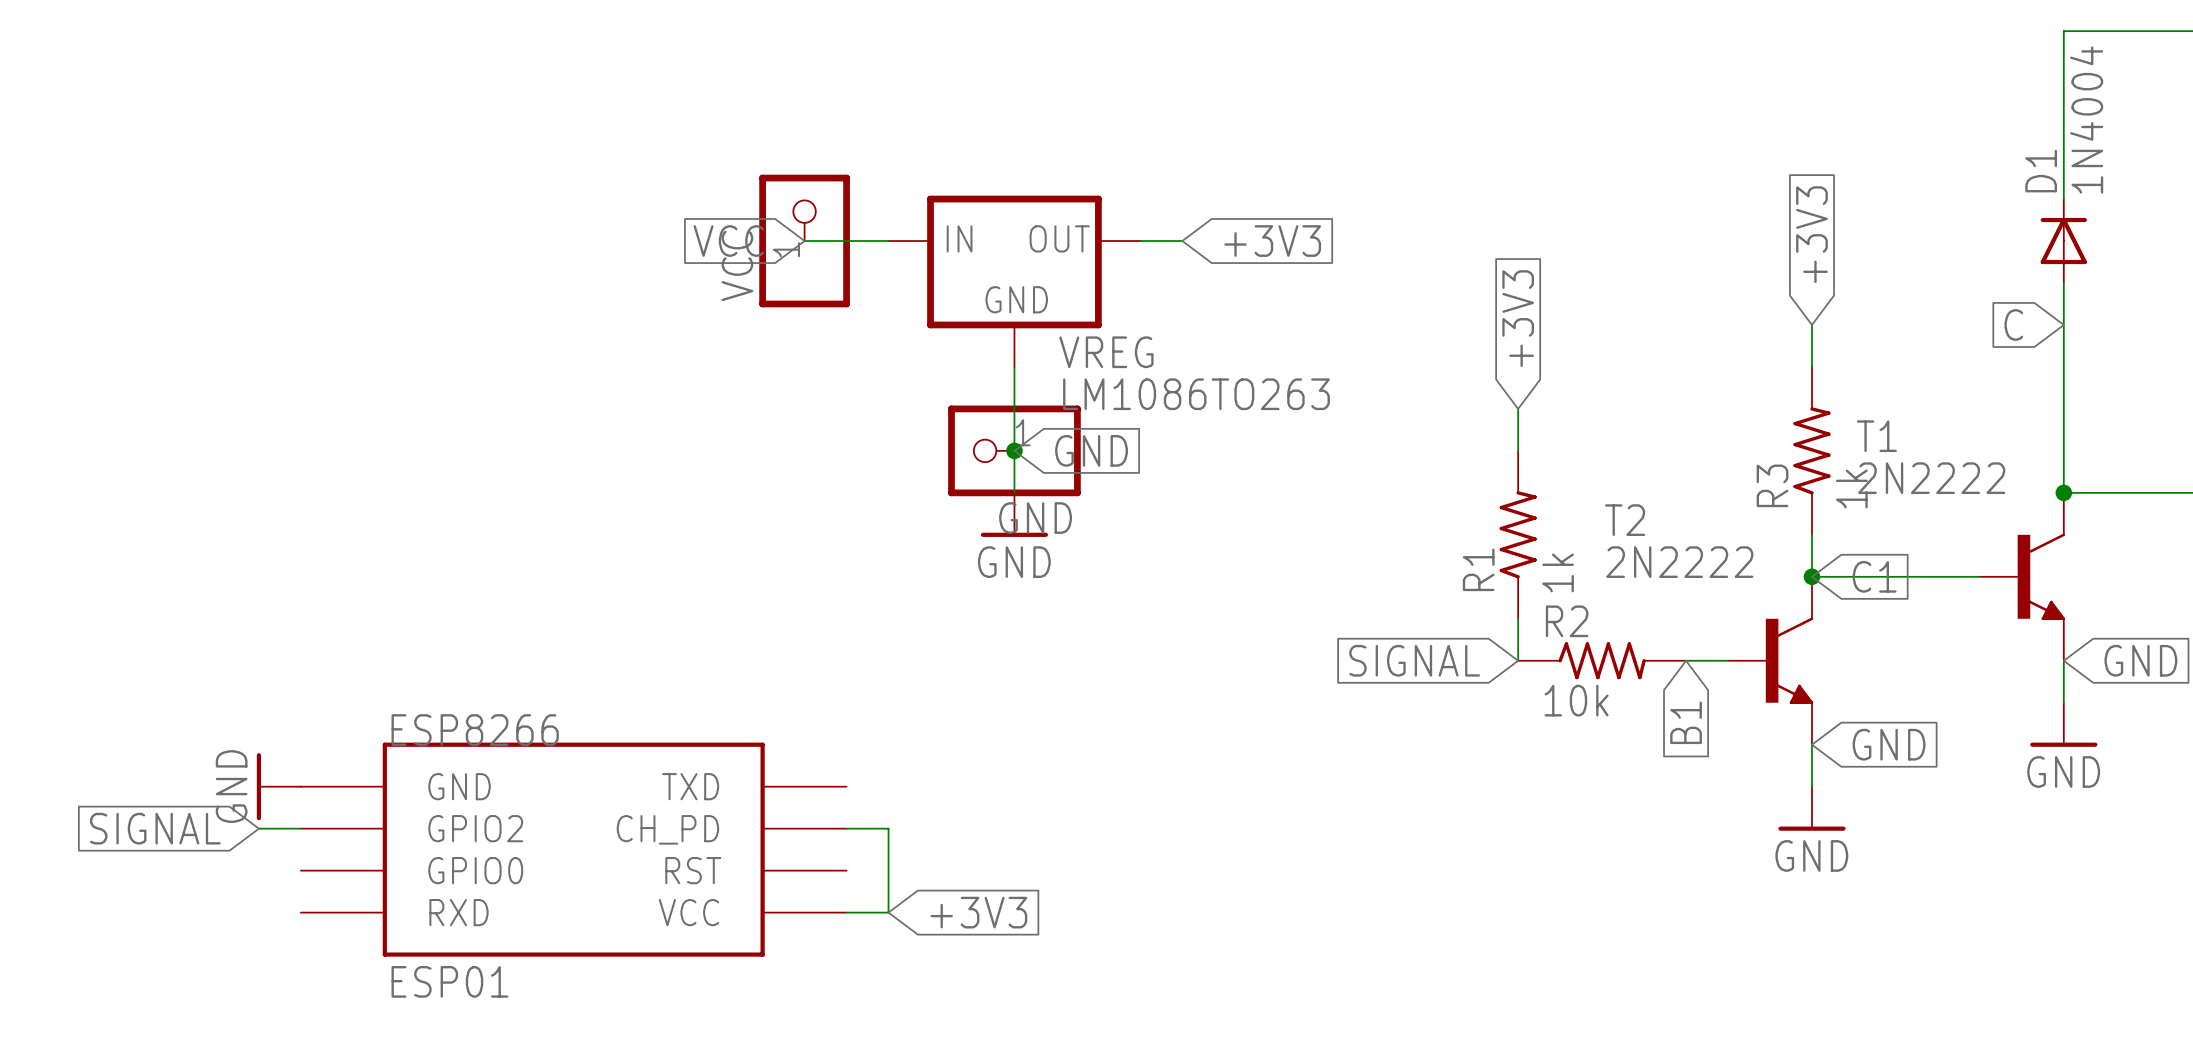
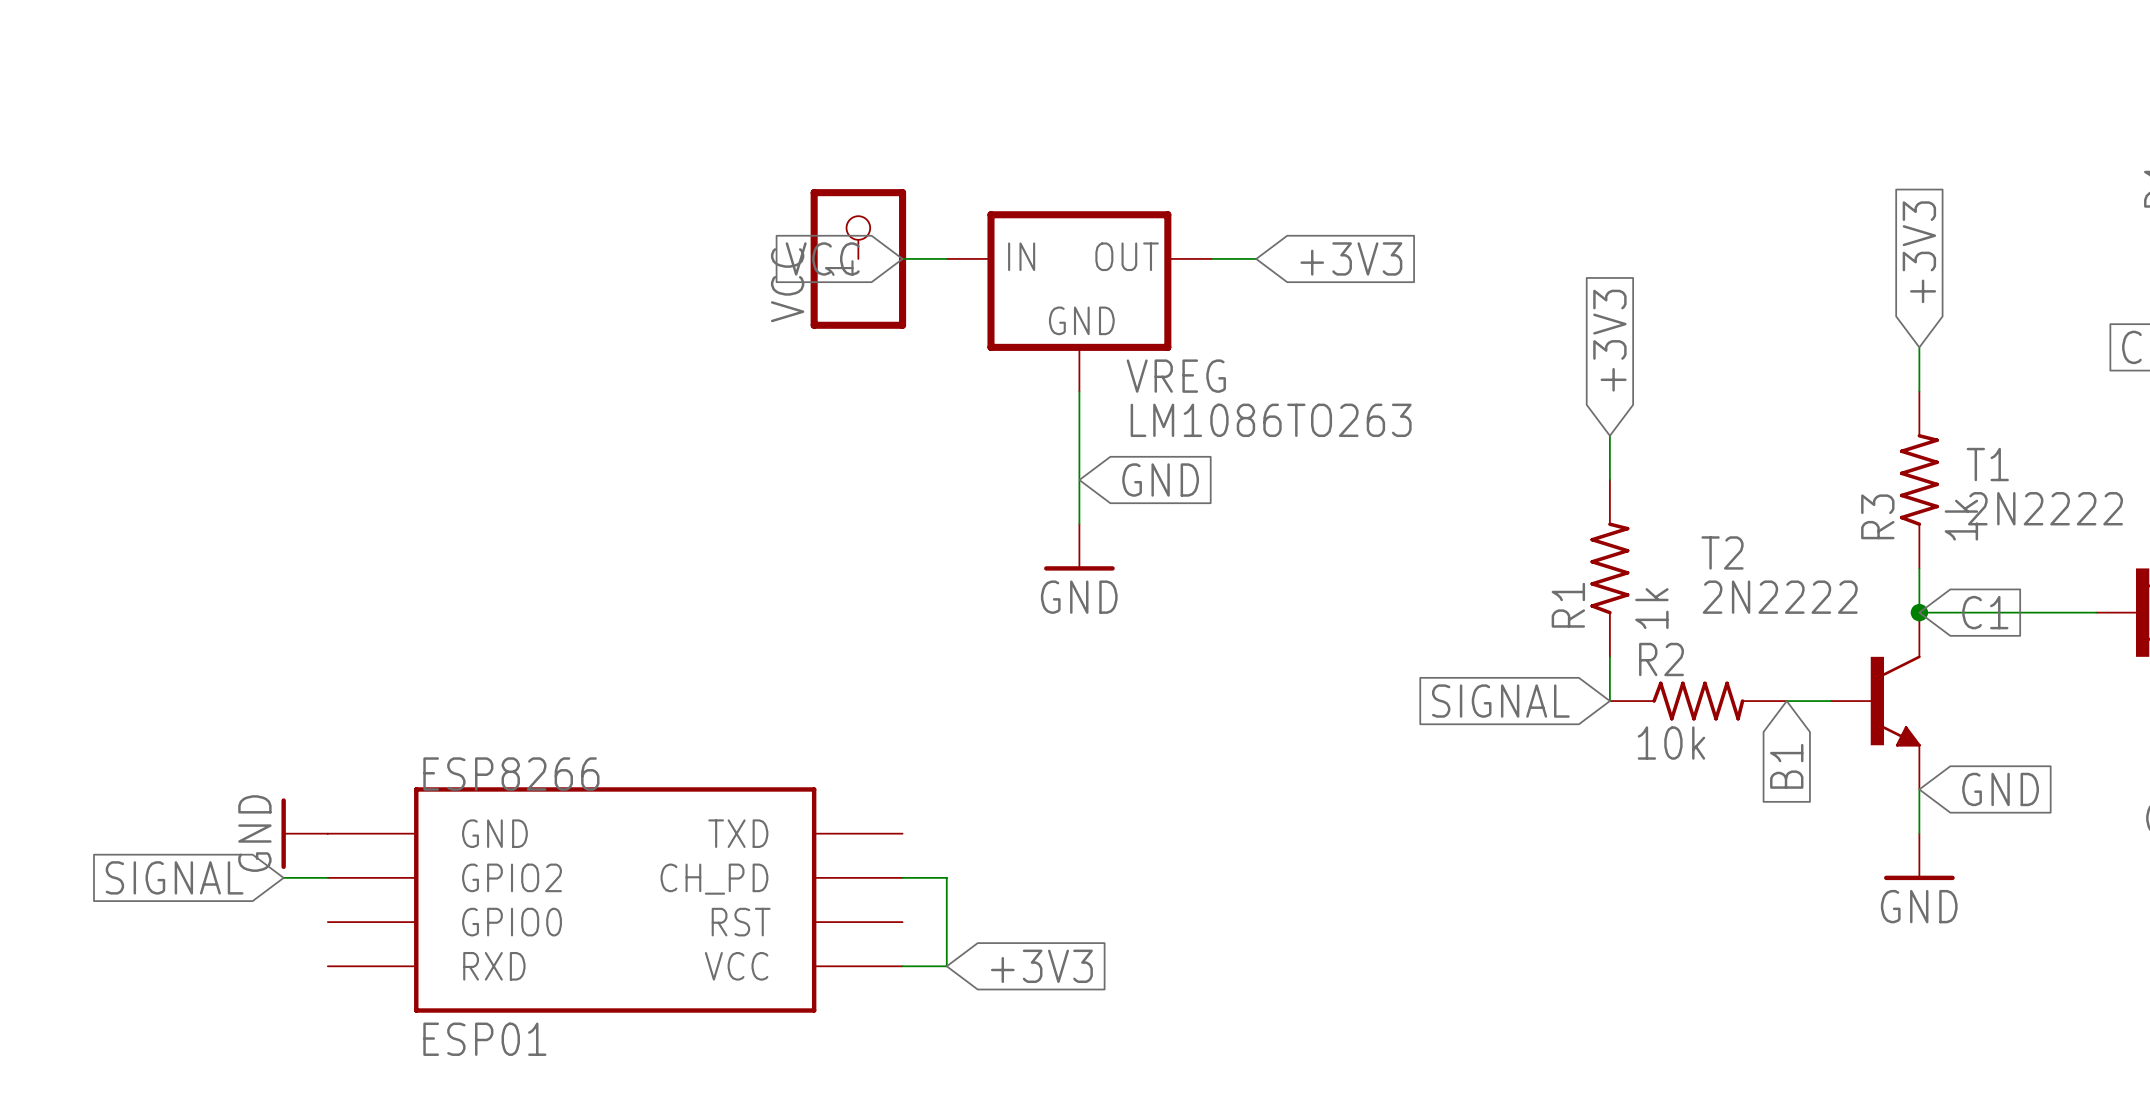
global label position: VCC (728, 241) -> VCC (822, 258)
wire: (804, 241) (846, 241) -> none
GND: (1014, 450) -> none
junction: (1014, 450) -> none

